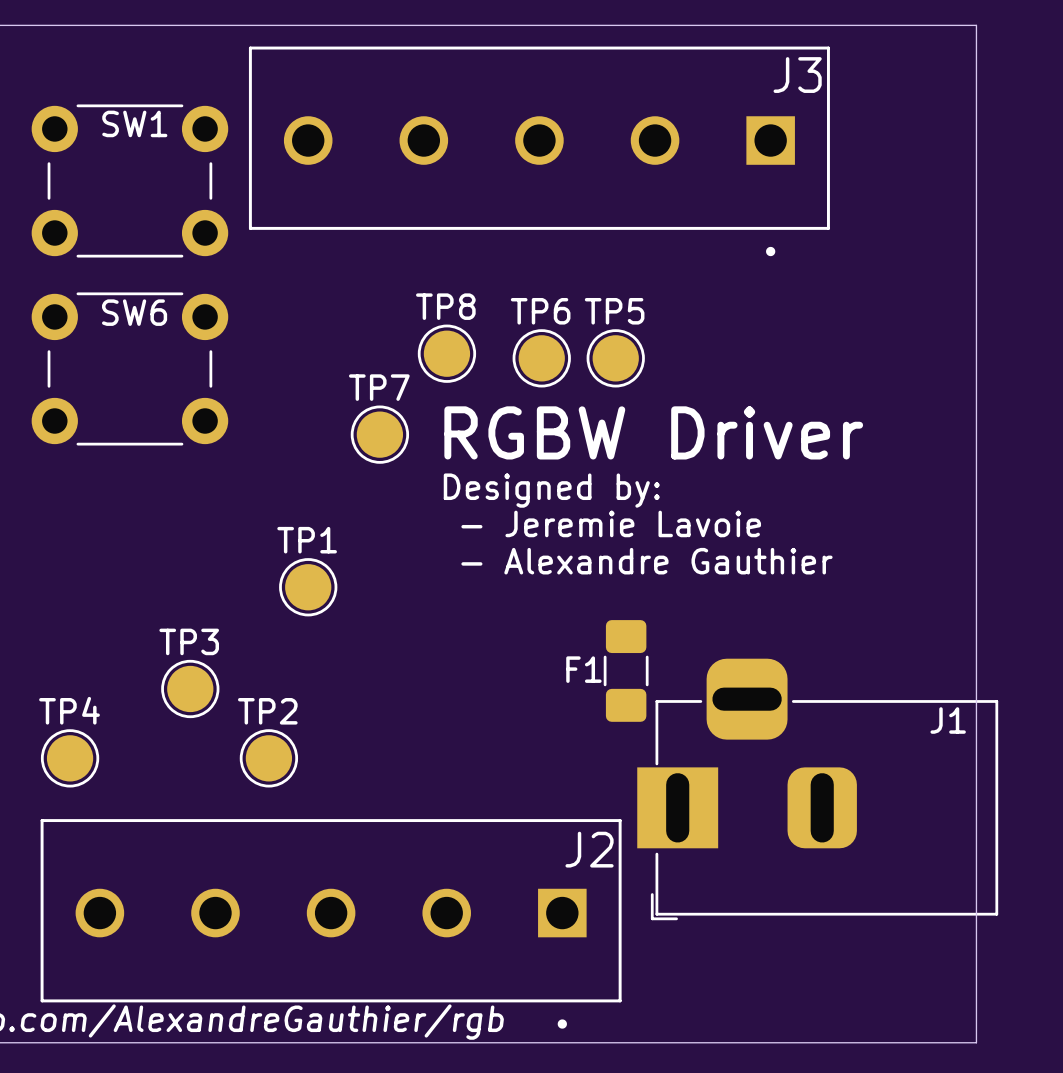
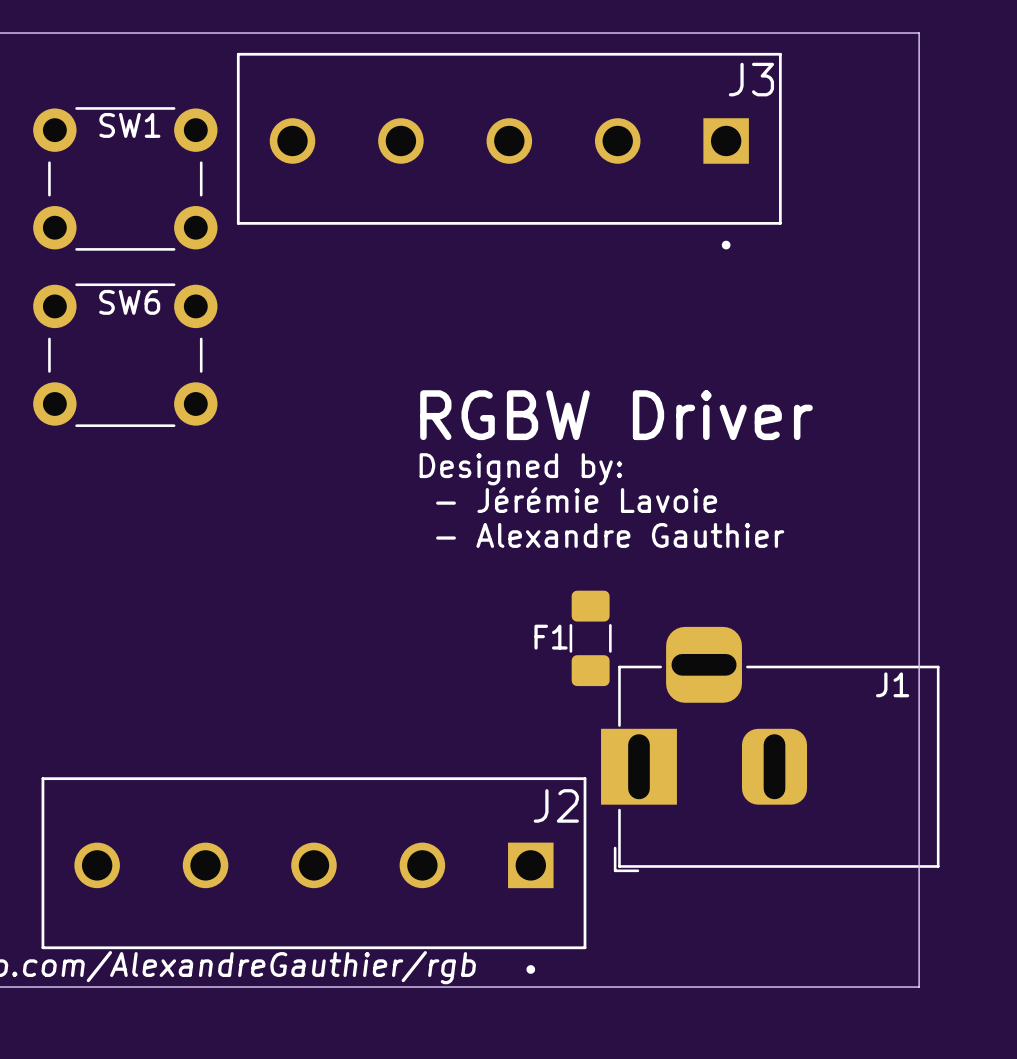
TP8: (446, 353) -> none
TP6: (541, 358) -> none
TP5: (615, 358) -> none
TP7: (379, 434) -> none
text: - Jeremie Lavoie (611, 523) -> - Jérémie Lavoie (576, 500)
TP1: (308, 587) -> none
TP3: (190, 688) -> none
TP4: (70, 758) -> none
TP2: (268, 758) -> none

